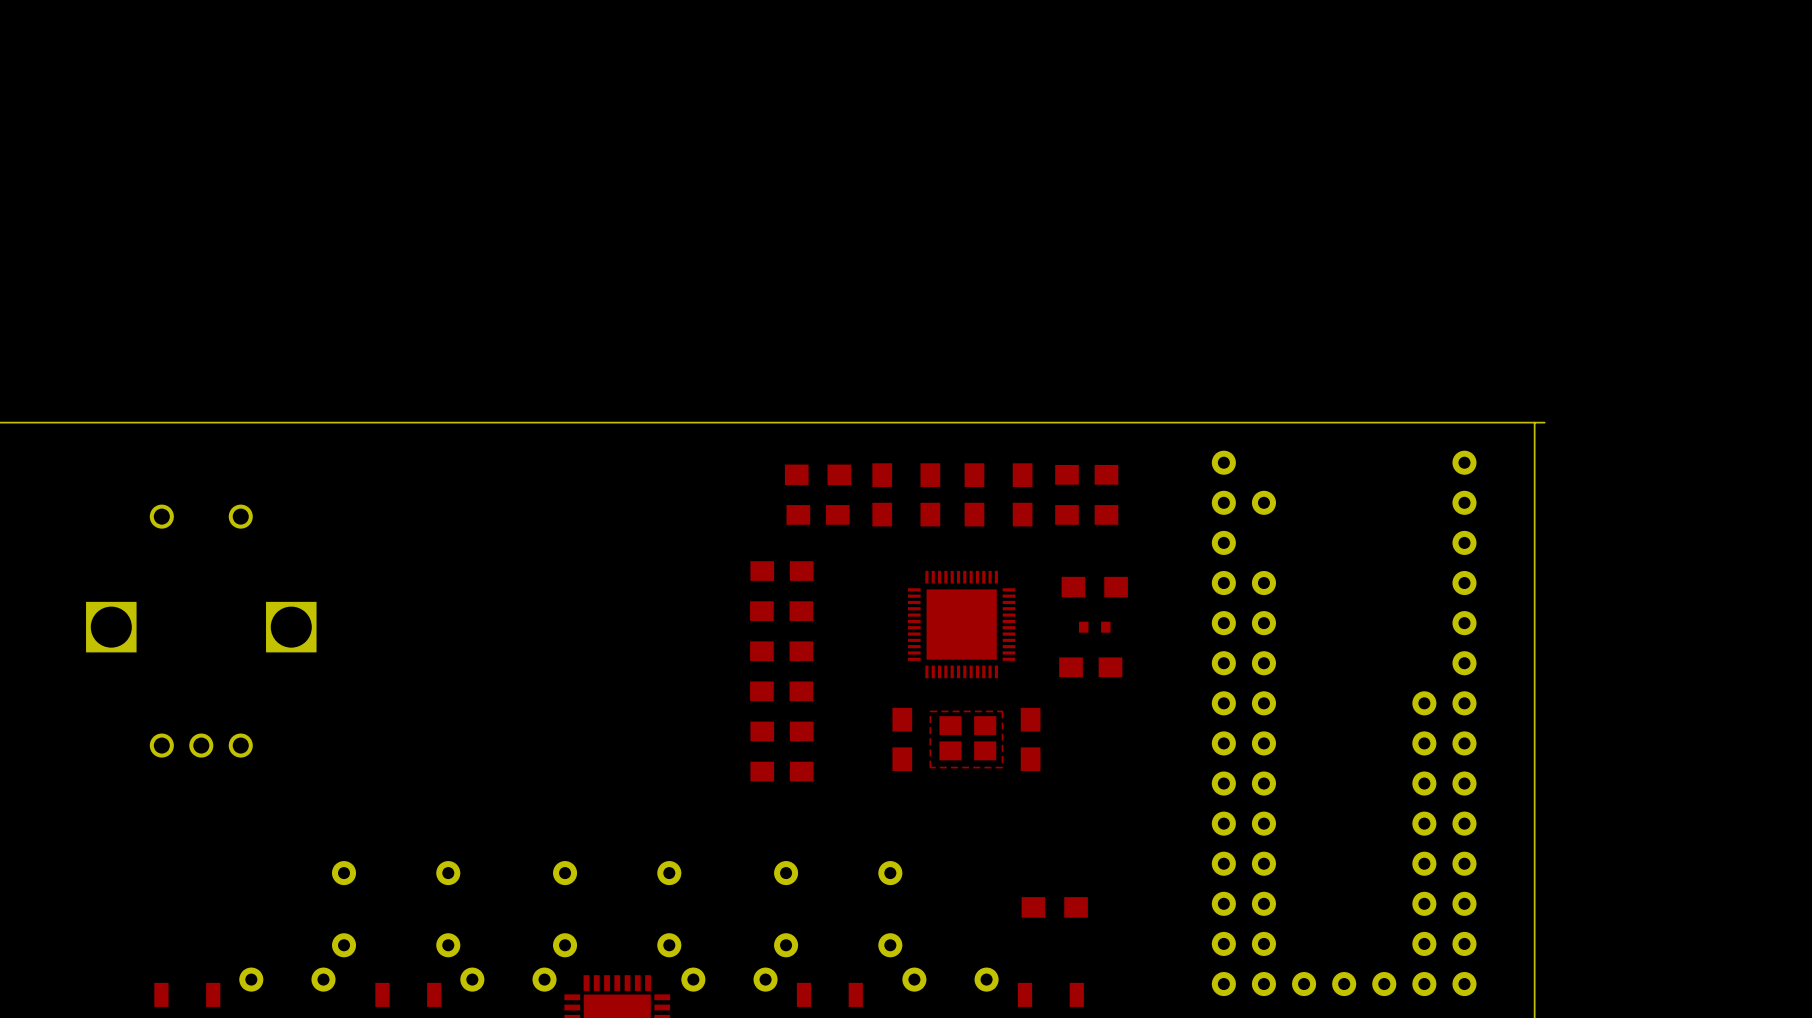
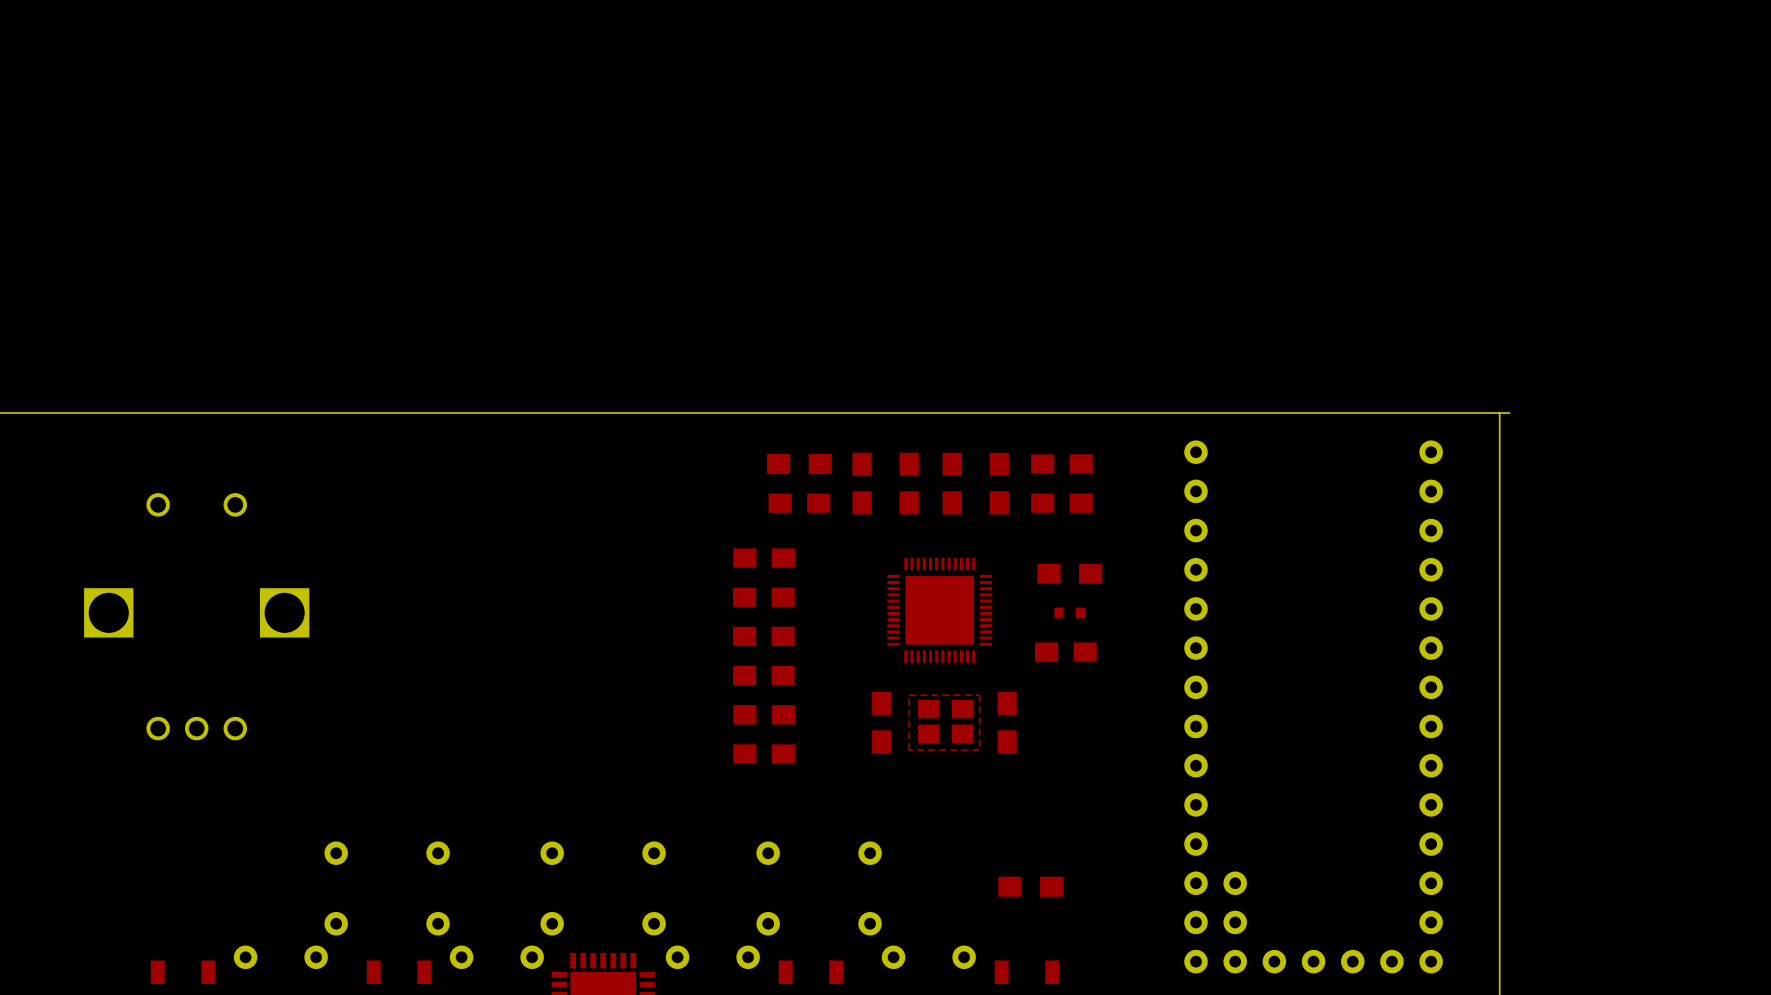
part footprint: [1211, 450, 1477, 997] -> [1184, 440, 1443, 974]

